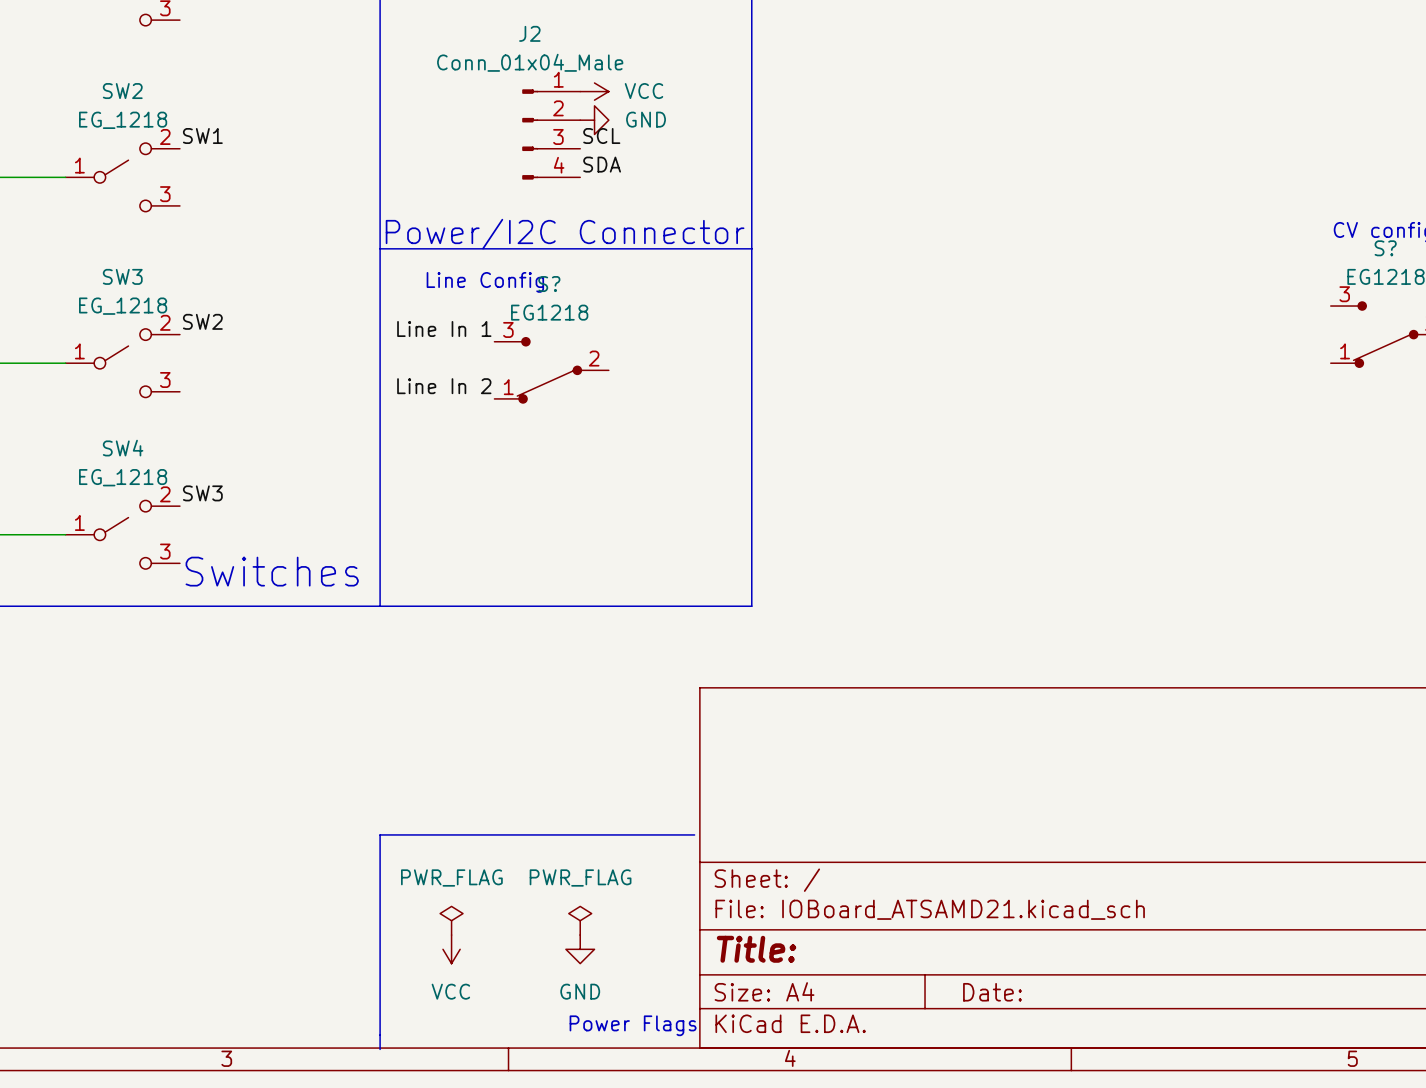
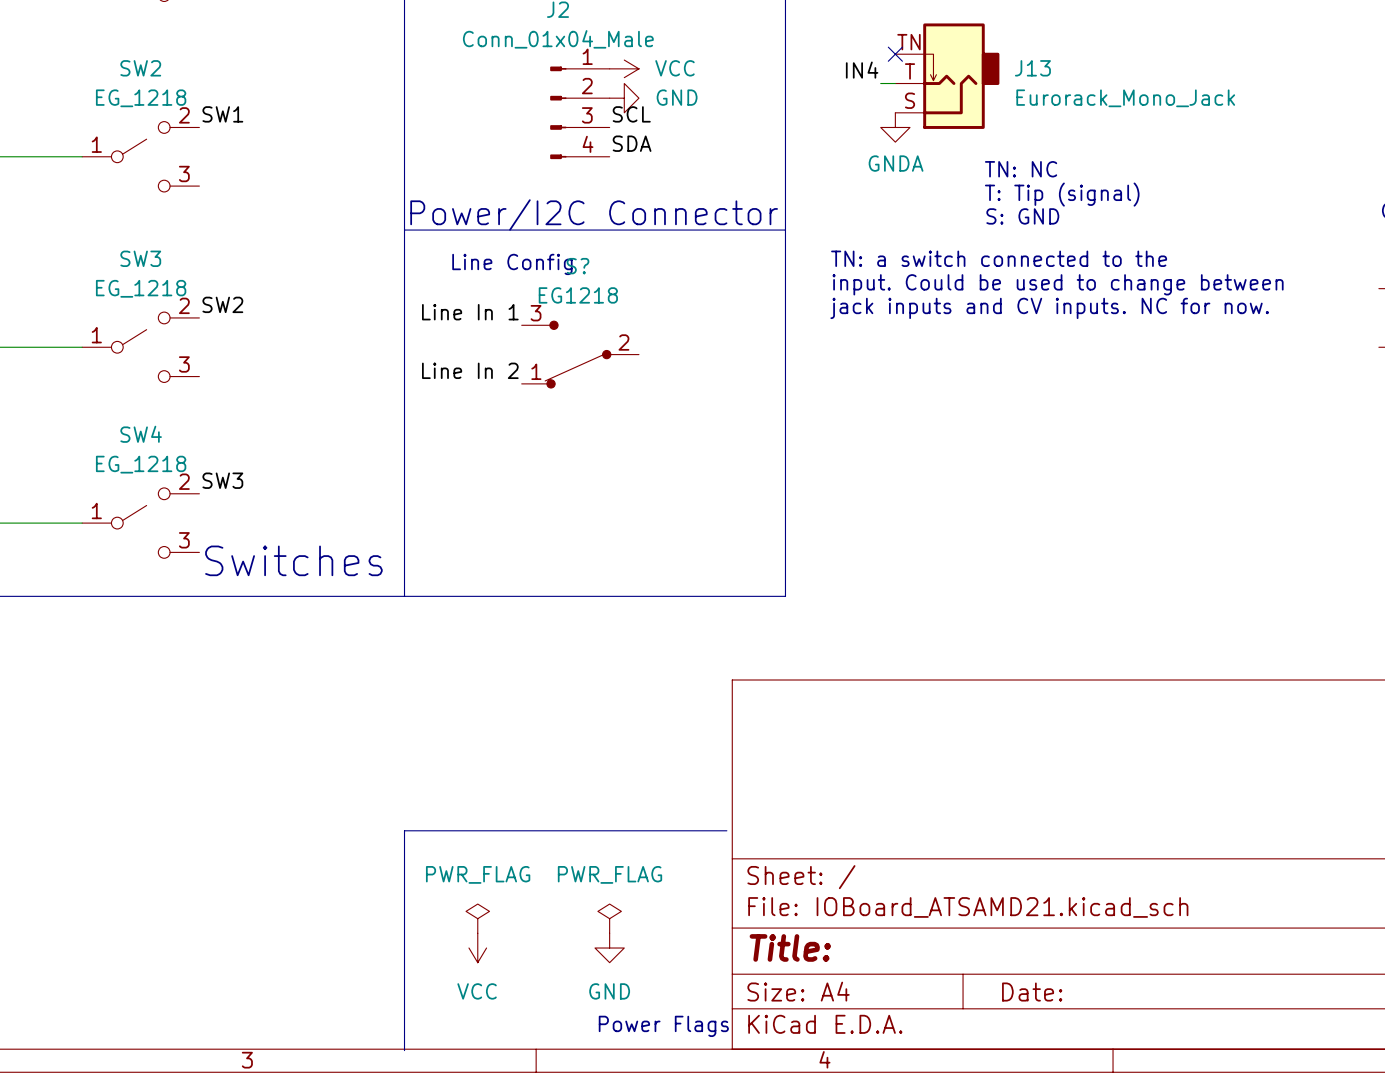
no-connect mark: none -> (895, 54)
label: none -> IN4 (862, 70)
J13: none -> Eurorack_Mono_Jack (947, 76)
wire: none -> (880, 83) (895, 83)
power symbol: none -> GNDA (895, 127)
text: none -> TN: NC (1021, 169)
text: none -> T: Tip (signal) (1062, 194)
text: none -> S: GND (1022, 216)
text: none -> TN: a switch connected to the (999, 258)
text: none -> input. Could be used to change between (1058, 284)
text: none -> jack inputs and CV inputs. NC for now. (1049, 308)

